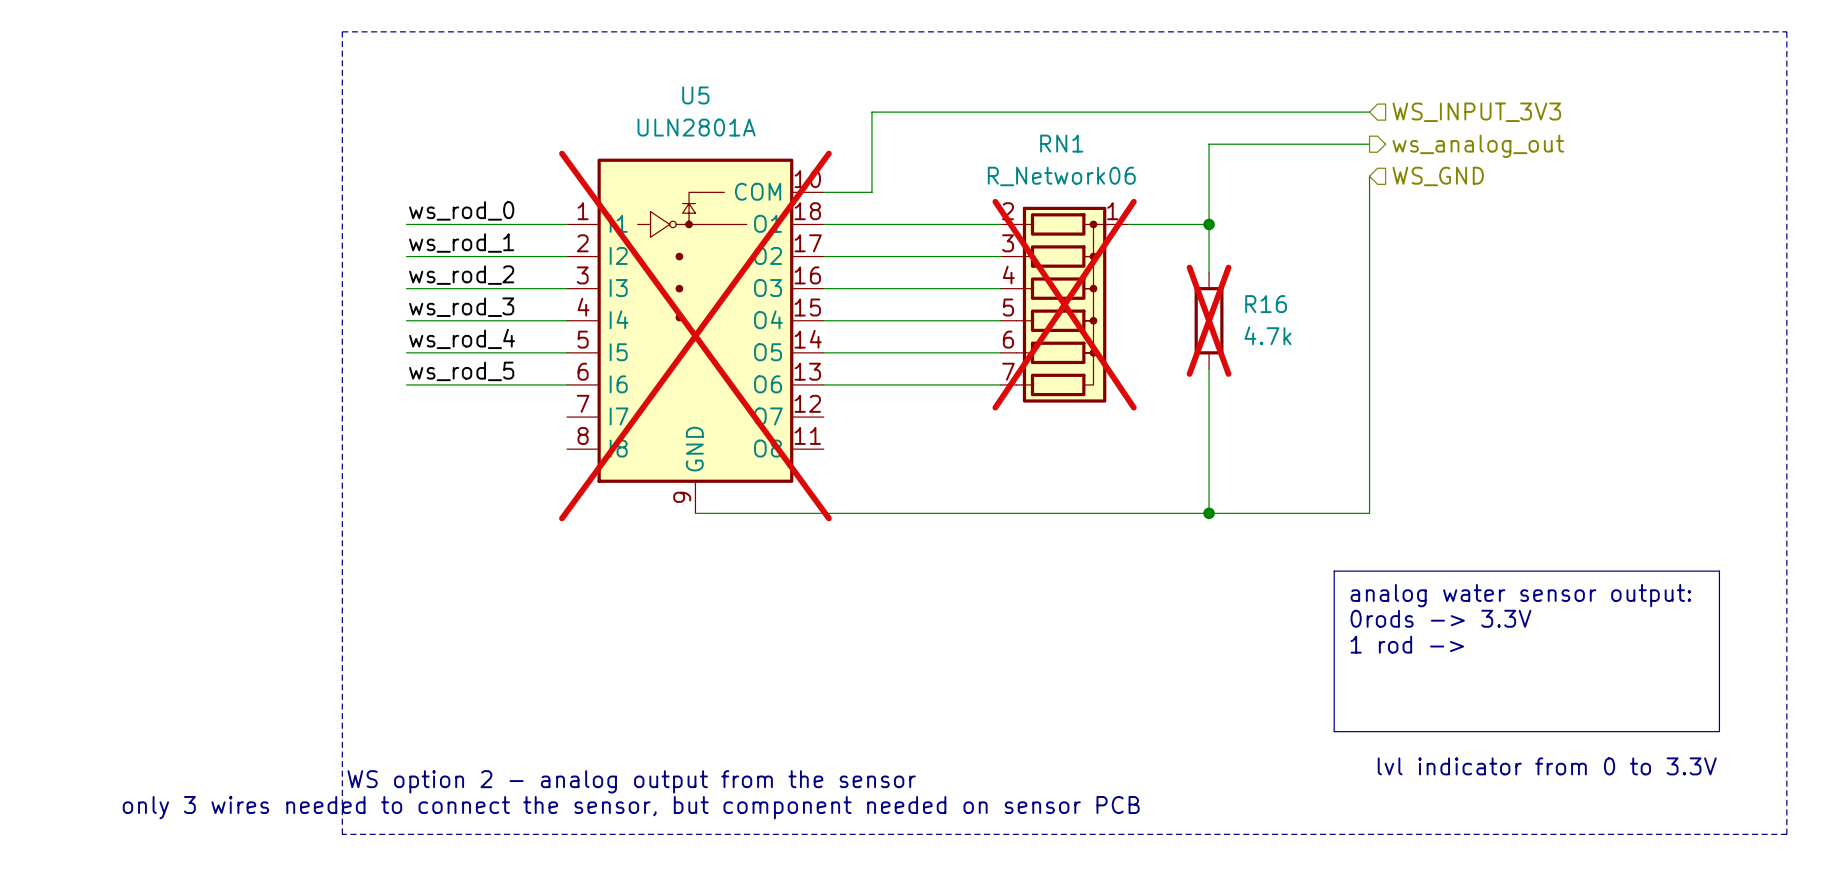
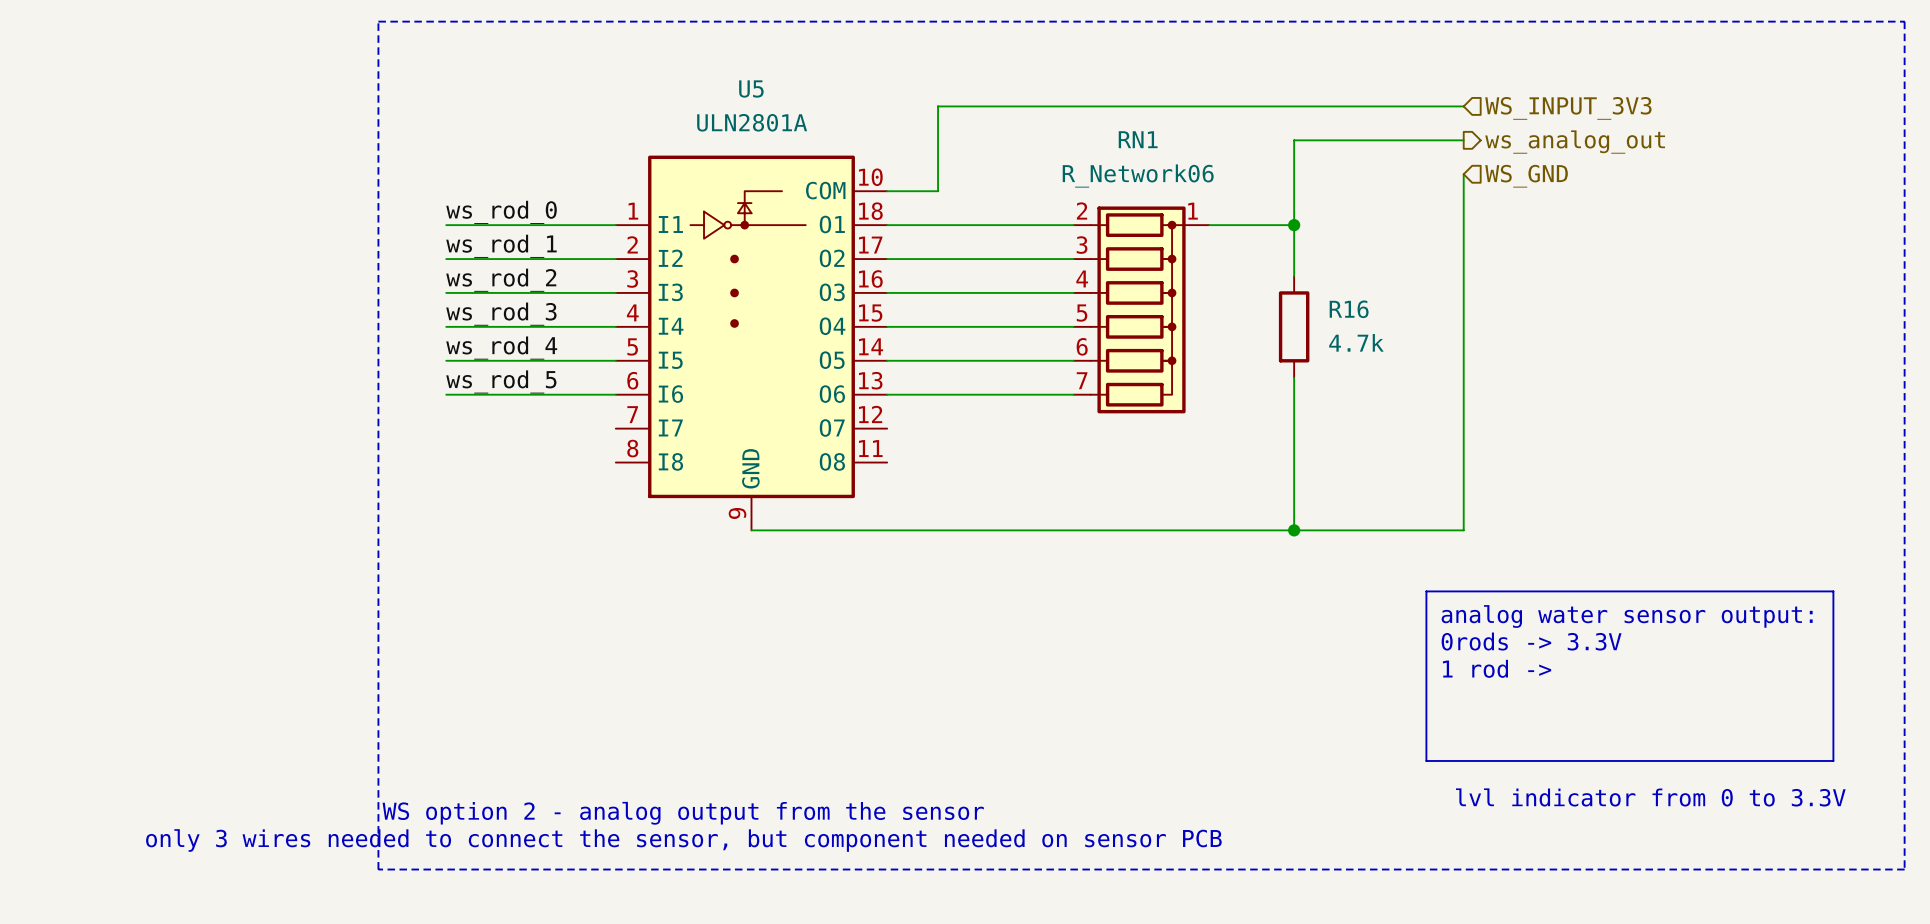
RN1 do-not-place cross: (1064, 304) -> none
R16 do-not-place cross: (1209, 320) -> none
U5 do-not-place cross: (695, 336) -> none

